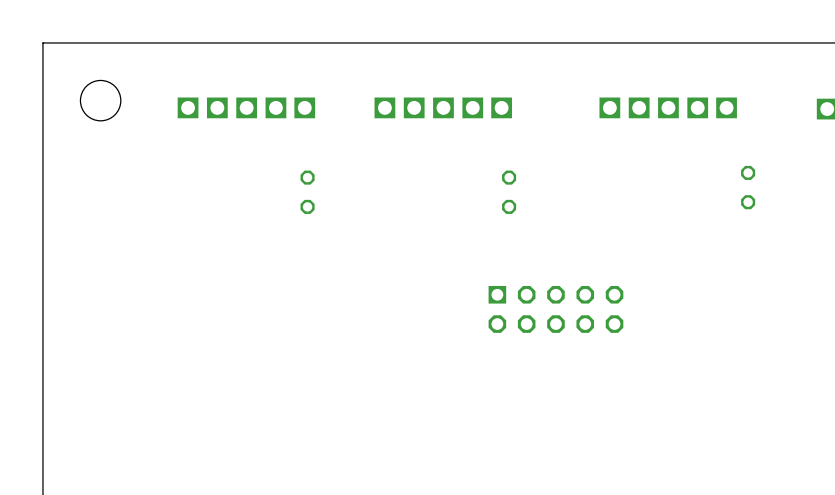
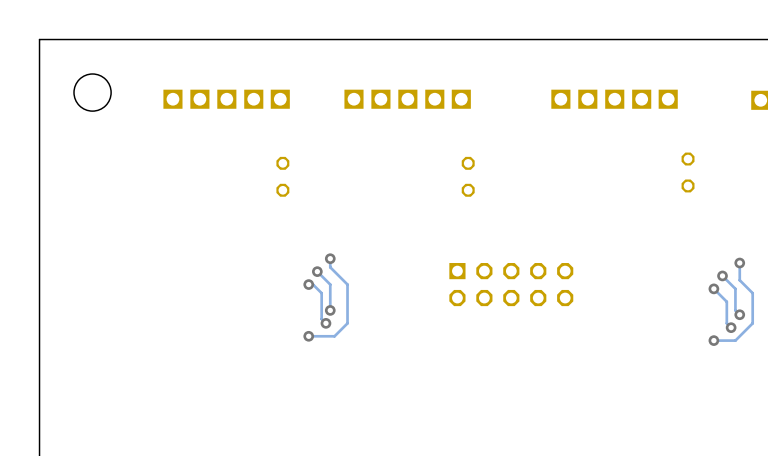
track: none -> (330, 258) (330, 267) (347, 284) (347, 323) (334, 336) (308, 336)
via: none -> (330, 258)
track: none -> (739, 263) (739, 280) (752, 293) (752, 323) (735, 340) (713, 340)
via: none -> (739, 263)
track: none -> (317, 271) (330, 284) (330, 310)
via: none -> (317, 271)
track: none -> (722, 275) (735, 288) (735, 310) (739, 314)
via: none -> (722, 275)
track: none -> (308, 284) (313, 284) (321, 293) (321, 319) (325, 323)
via: none -> (308, 284)
track: none -> (713, 288) (726, 301) (726, 323) (731, 327)
via: none -> (713, 288)
via: none -> (330, 310)
via: none -> (739, 314)
via: none -> (325, 323)
via: none -> (731, 327)
via: none -> (308, 336)
via: none -> (713, 340)

